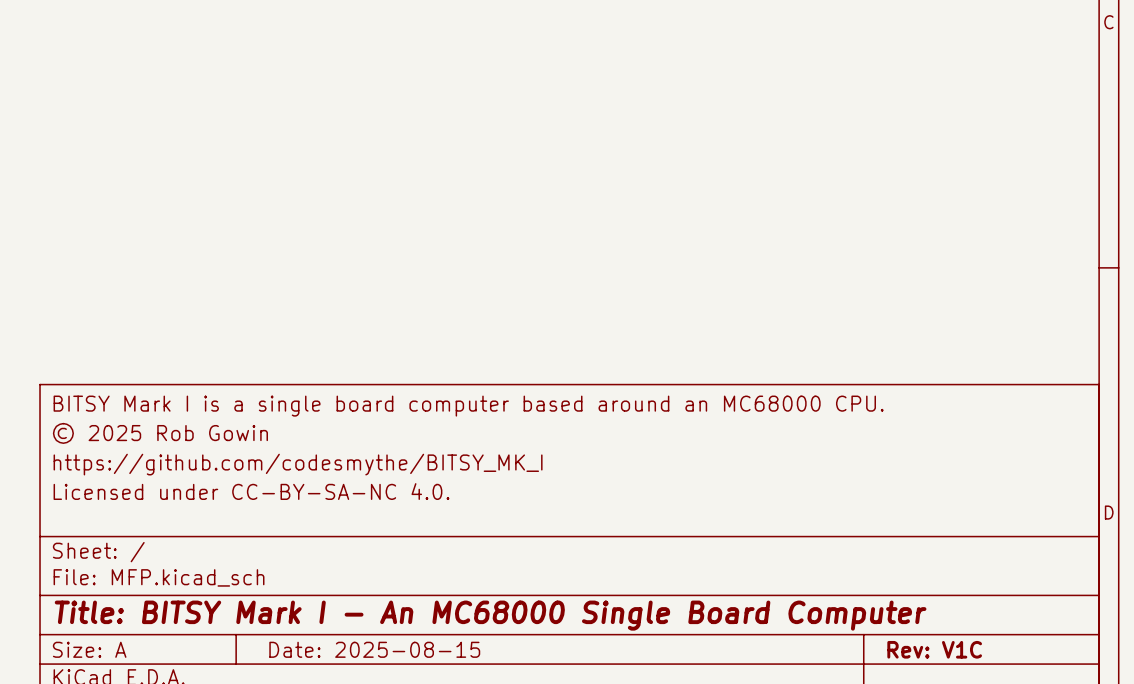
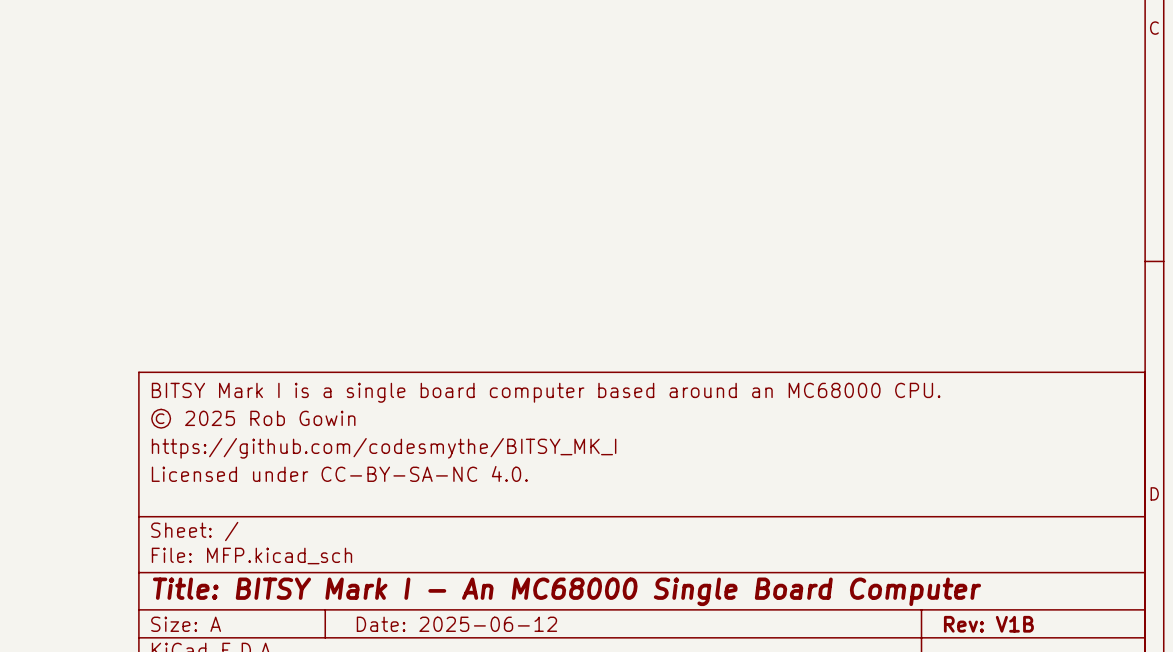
title block: Date: 2025-08-15 (374, 649) -> Date: 2025-06-12 (456, 624)
title block: Rev: V1C (934, 649) -> Rev: V1B (988, 624)

